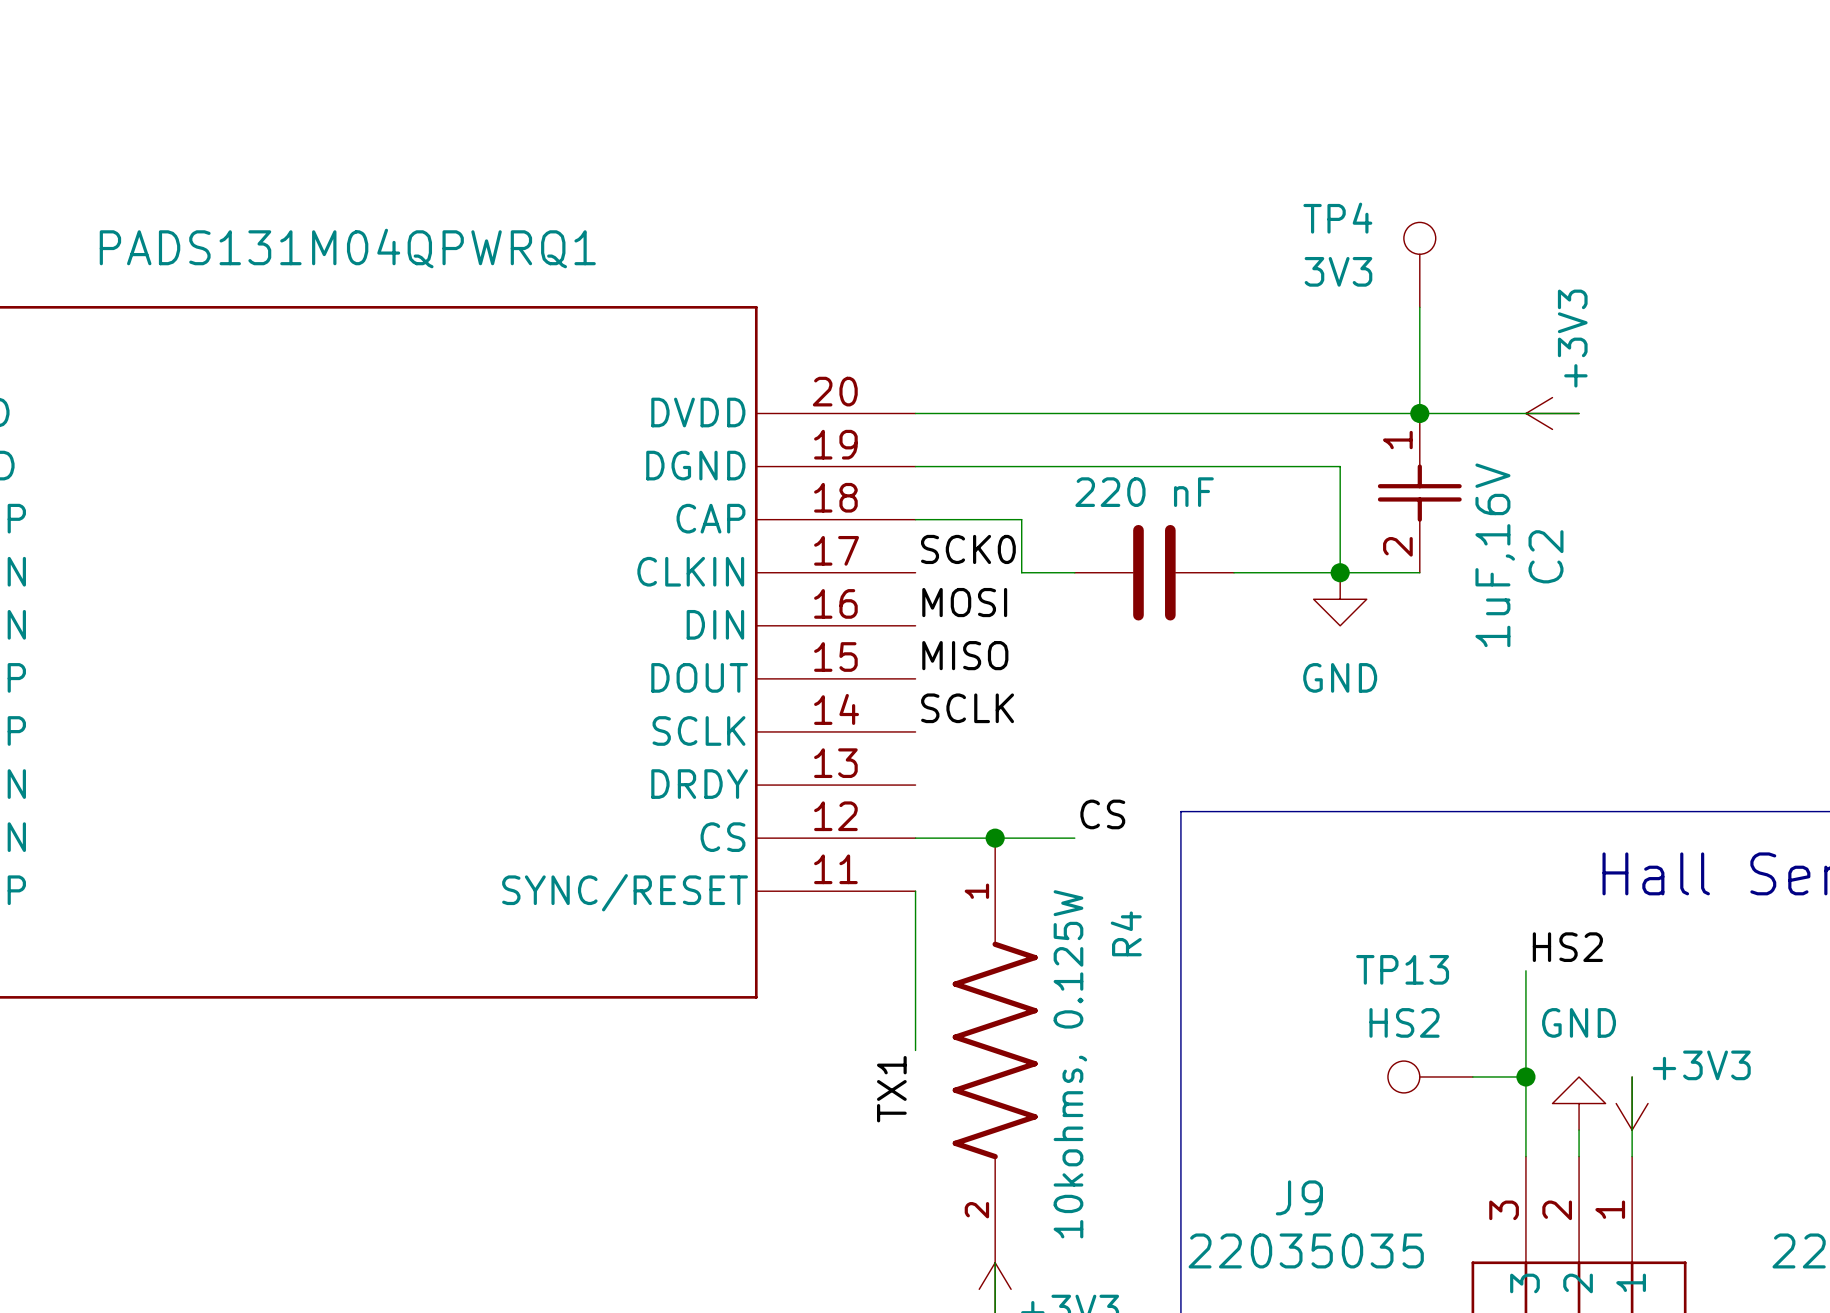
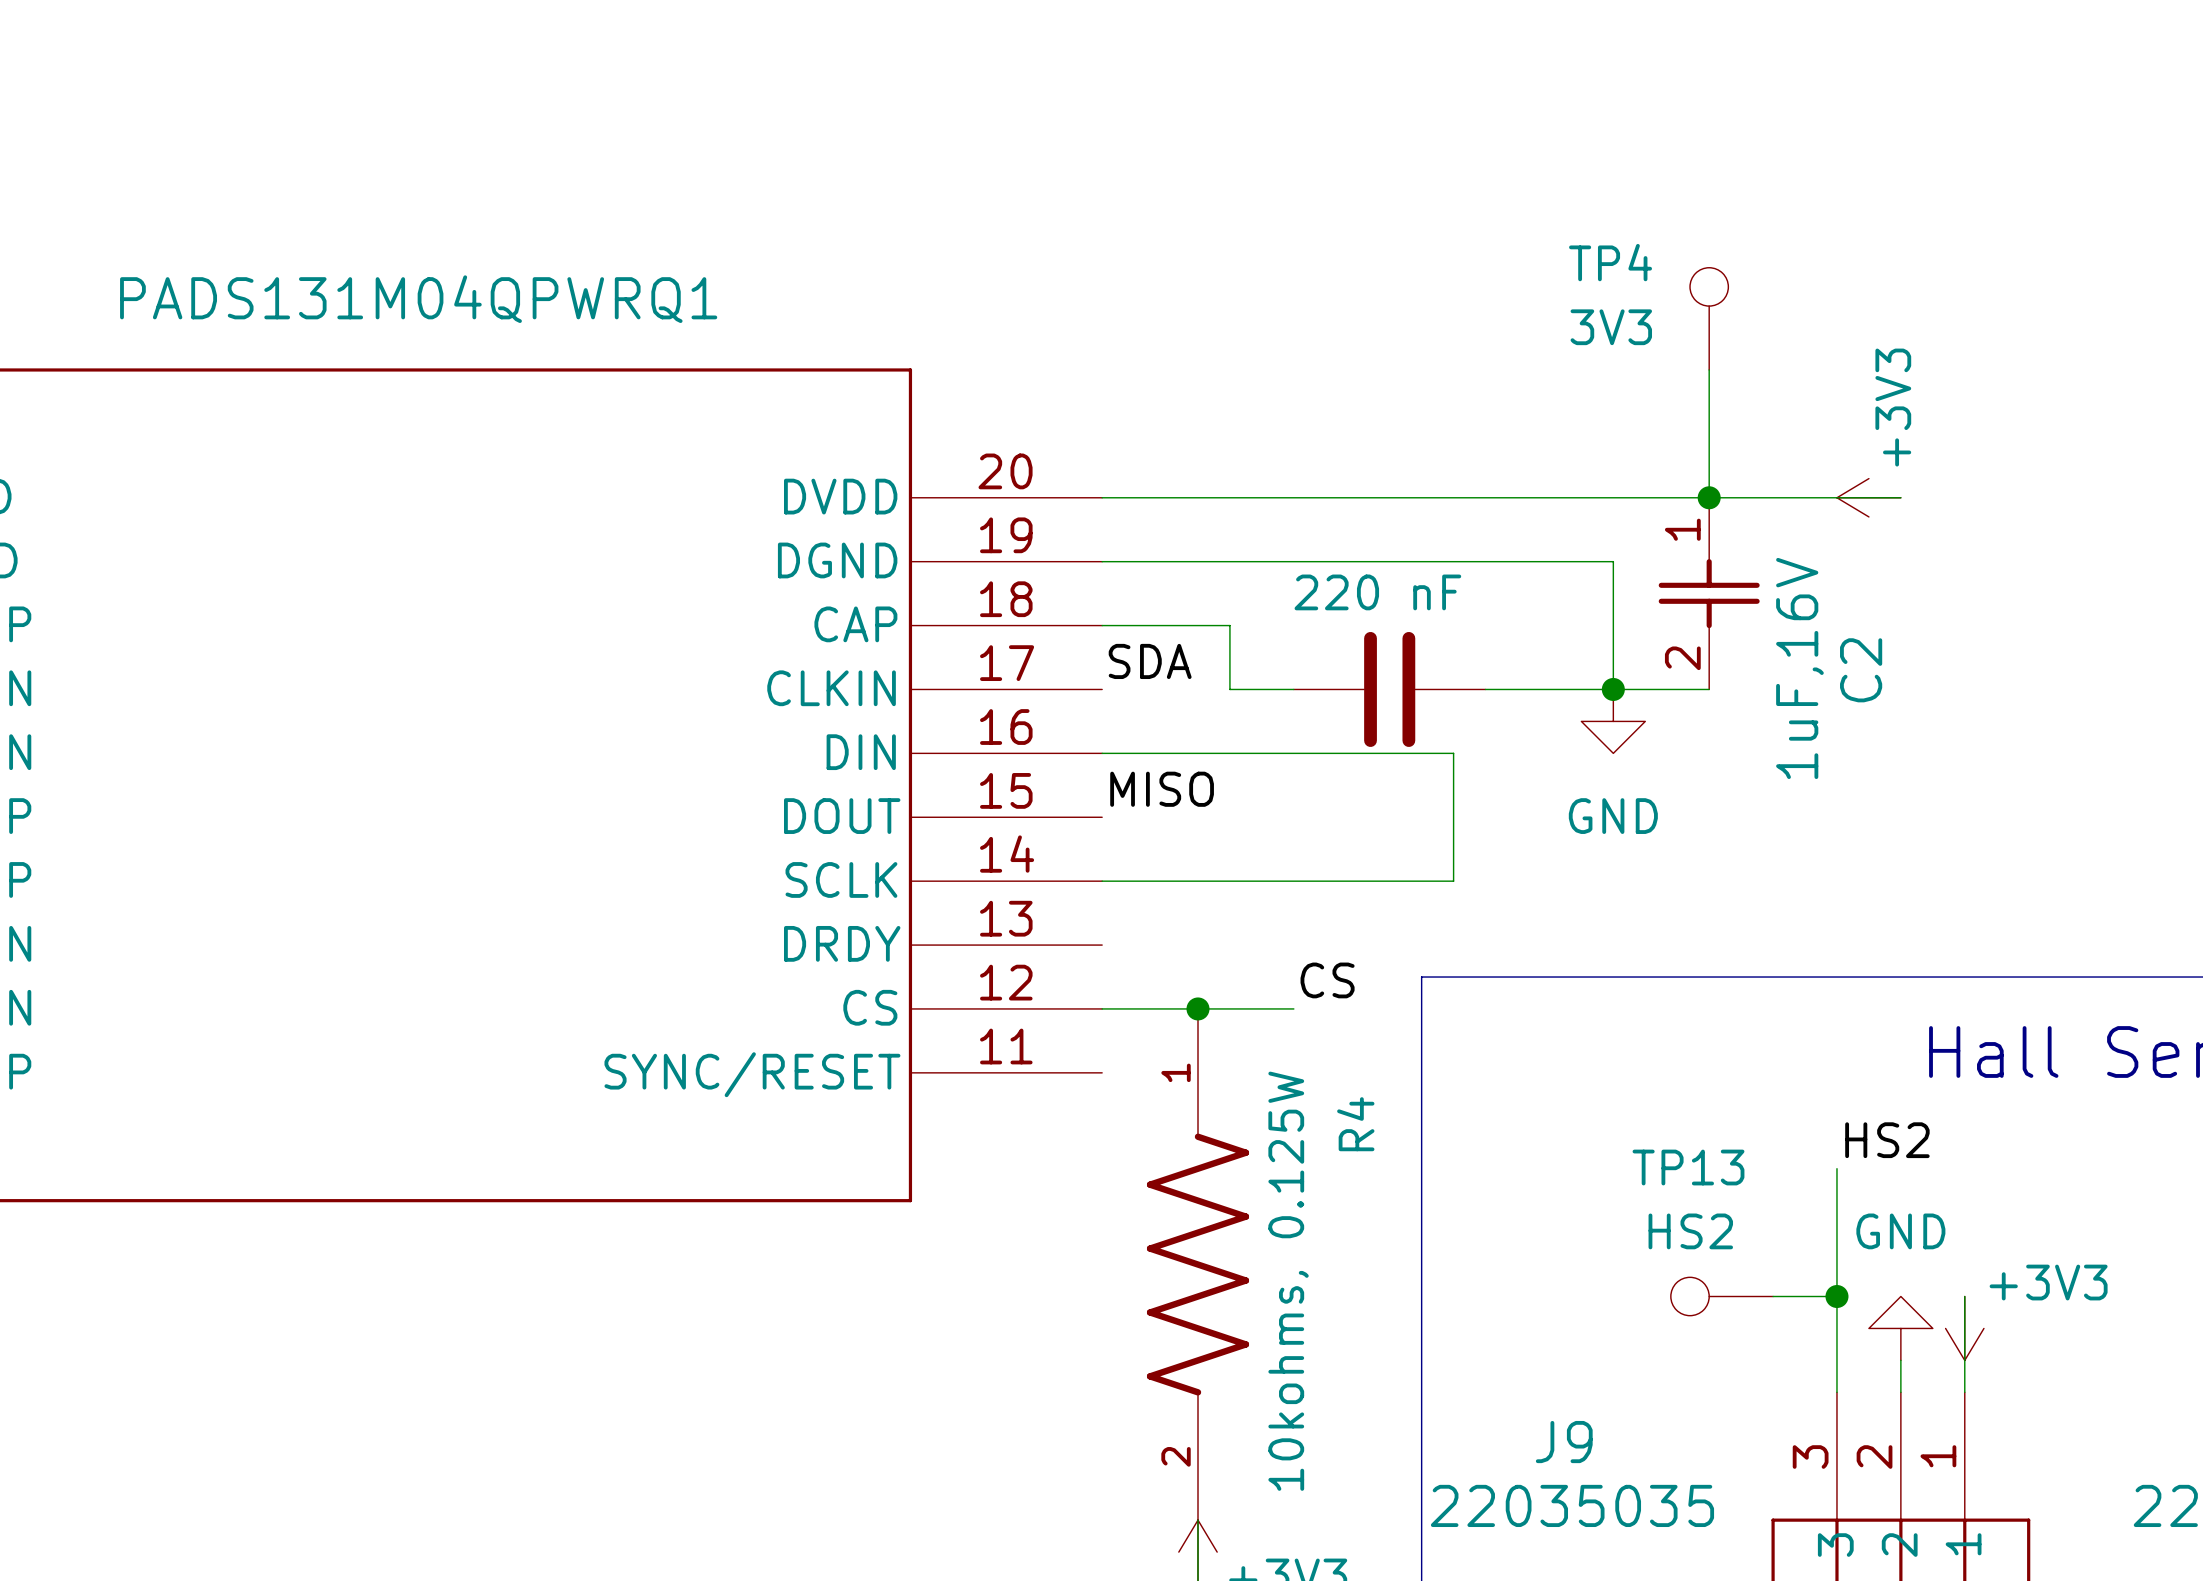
label: SCK0 (968, 549) -> SDA (1150, 661)
label: MOSI (964, 602) -> none
wire: none -> (1102, 753) (1453, 753) (1453, 881) (1102, 881)
label: SCLK (967, 708) -> none
wire: (915, 891) (915, 1050) -> none
label: TX1 (891, 1089) -> none

